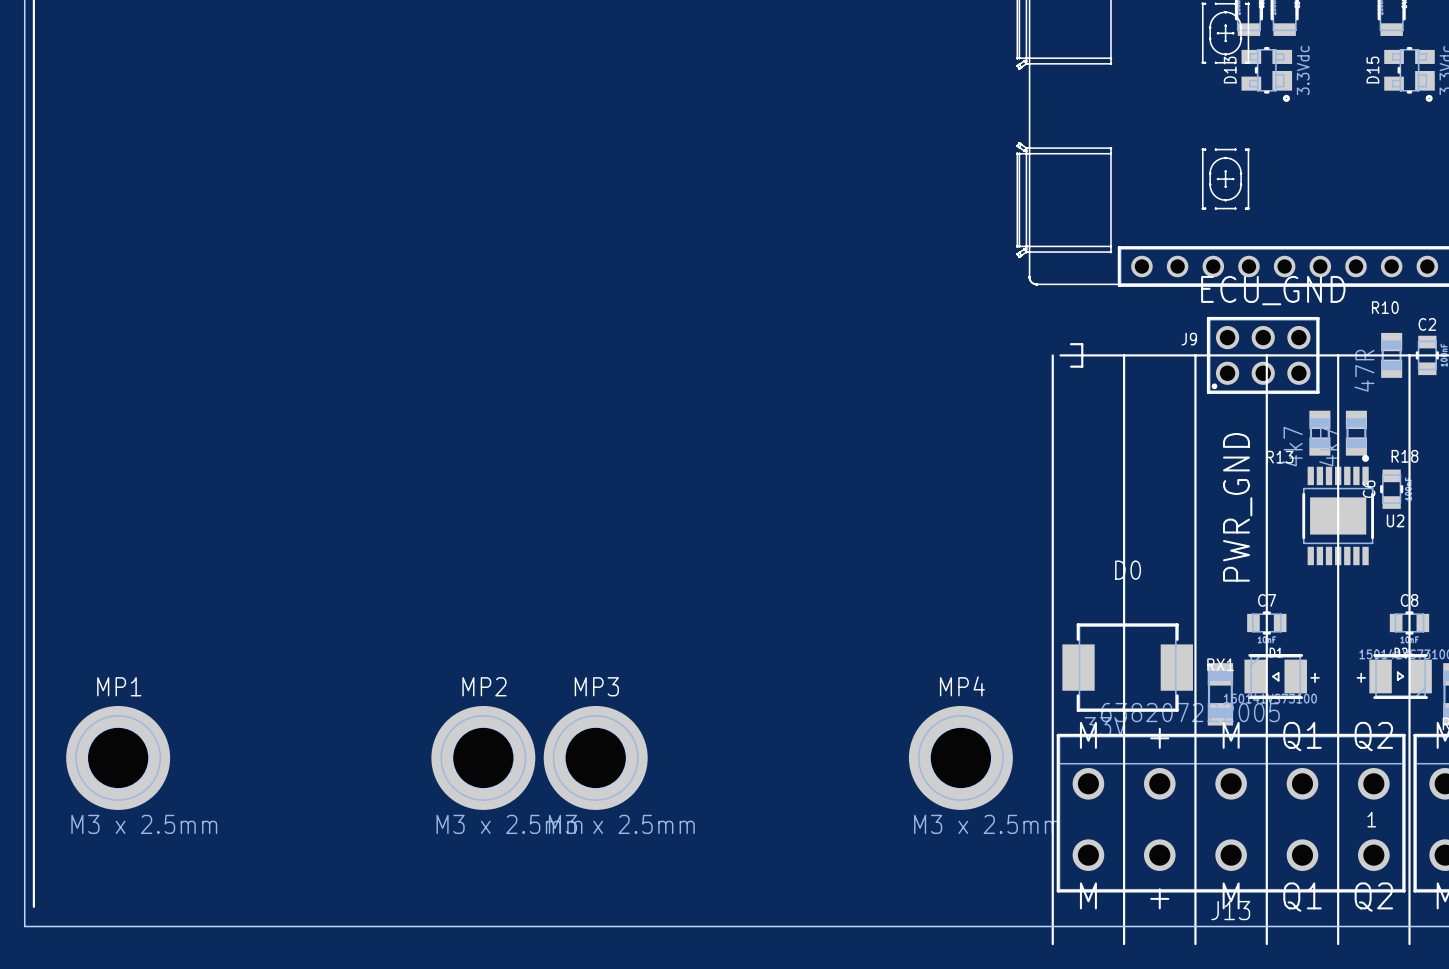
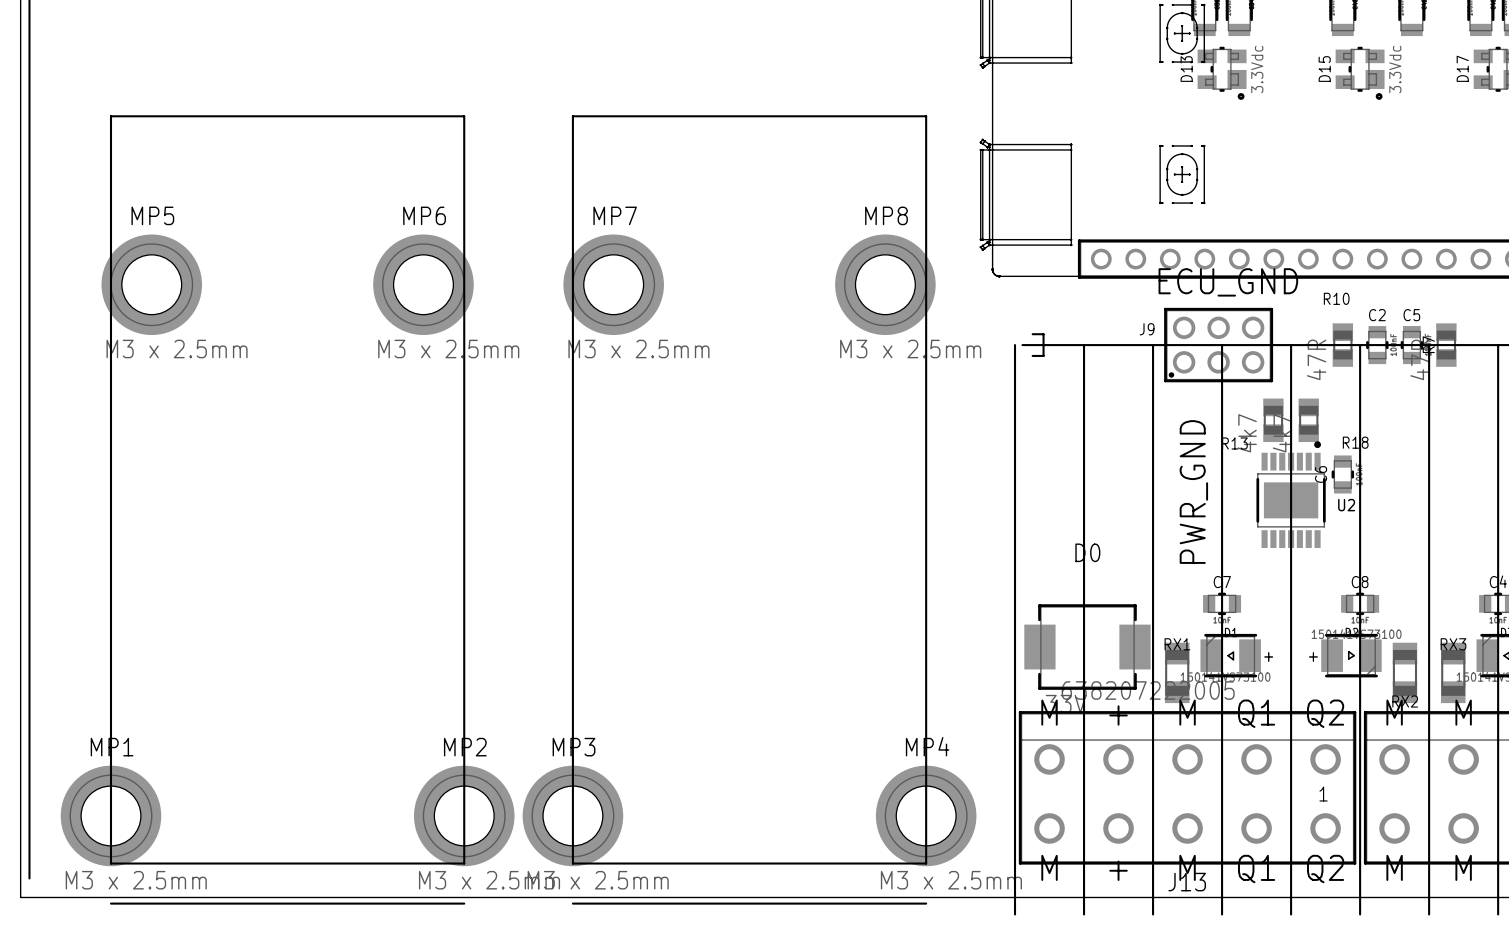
line: none -> (110, 116) (110, 863) (464, 863) (464, 116) (110, 116)
line: none -> (572, 116) (572, 863) (926, 863) (926, 116) (572, 116)
MP5: none -> M3 x 2.5mm (151, 284)
MP6: none -> M3 x 2.5mm (423, 284)
MP7: none -> M3 x 2.5mm (613, 284)
MP8: none -> M3 x 2.5mm (885, 284)
MP1 position: (118, 757) -> (110, 815)
MP2 position: (483, 757) -> (464, 815)
MP3 position: (595, 757) -> (572, 815)
MP4 position: (960, 757) -> (926, 815)
line: none -> (110, 903) (464, 903)
line: none -> (572, 903) (926, 903)

